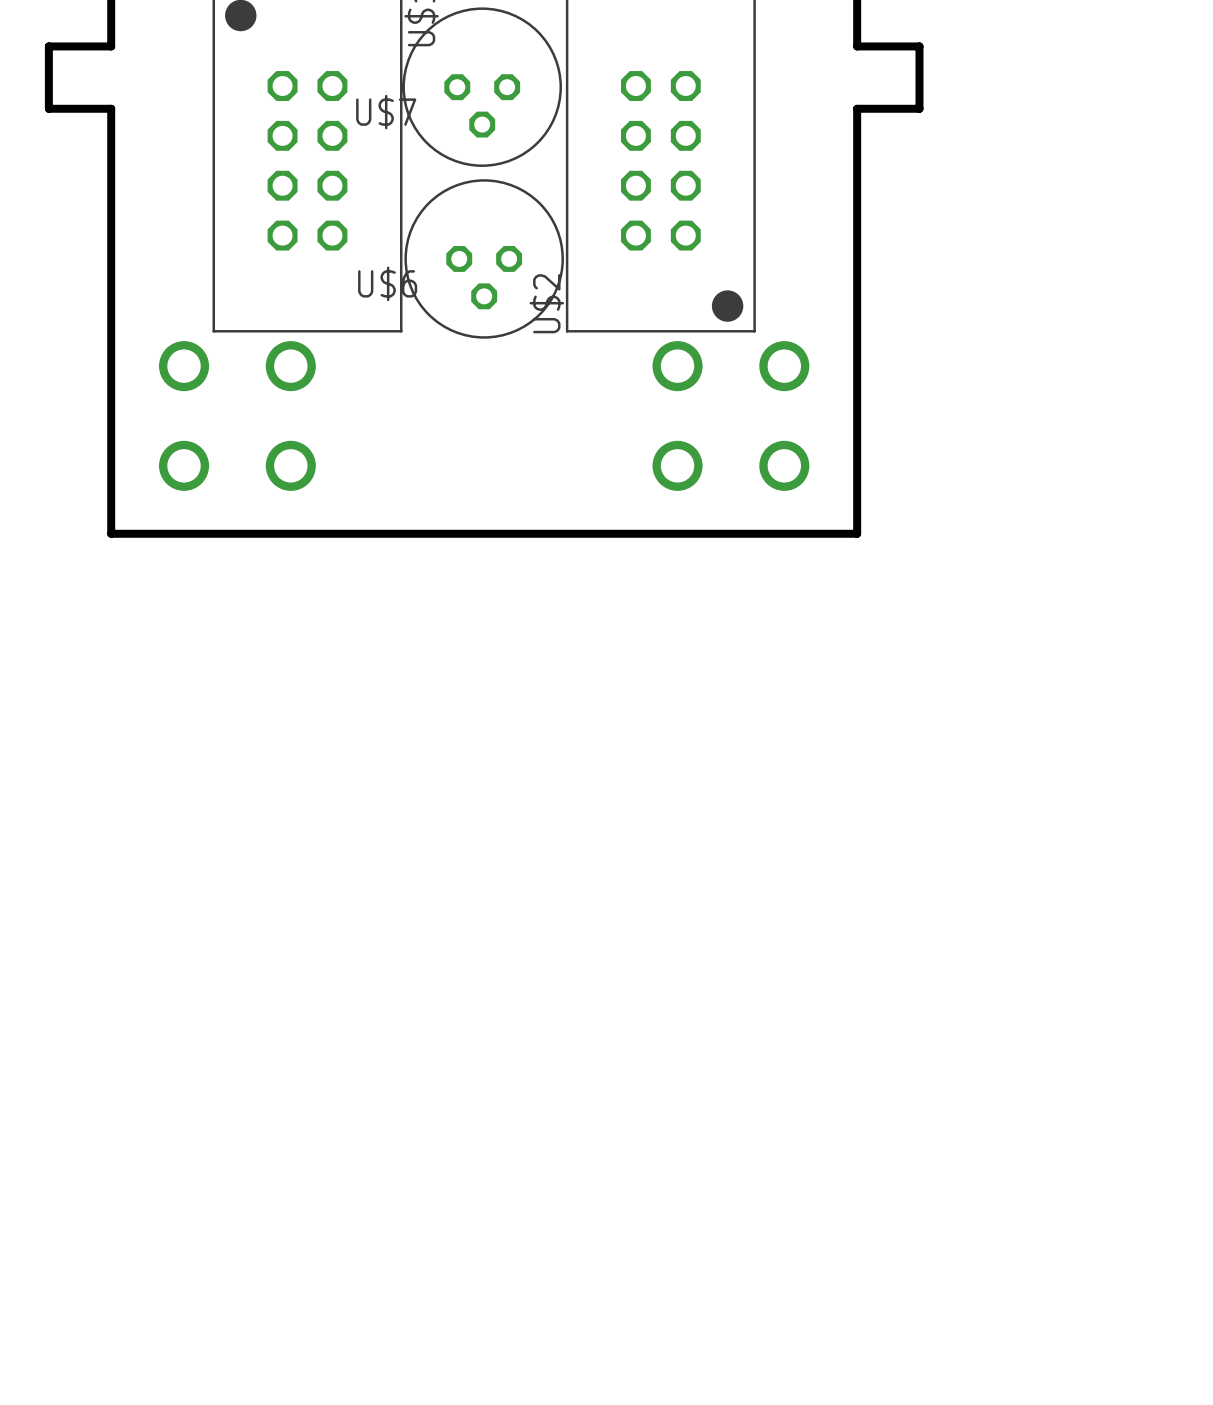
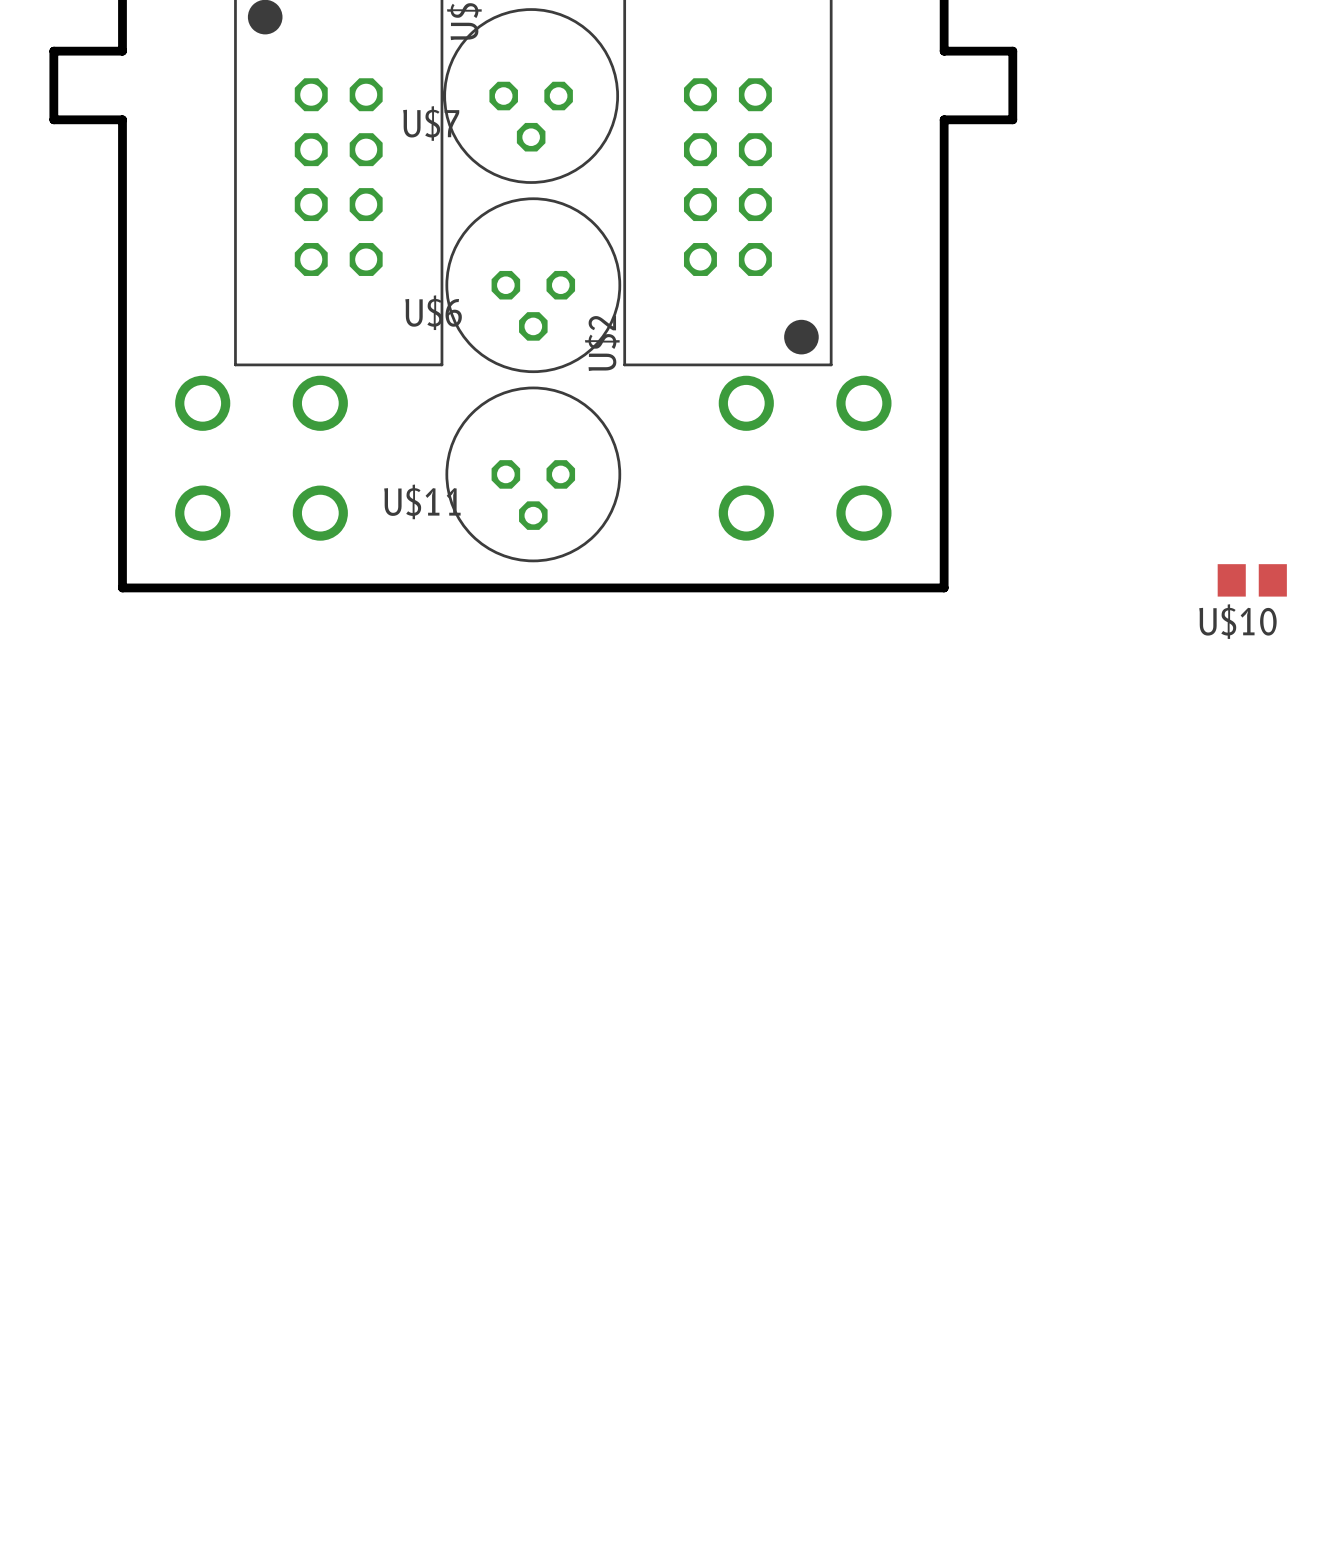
U$11: none -> (533, 474)
U$10: none -> (1252, 580)

